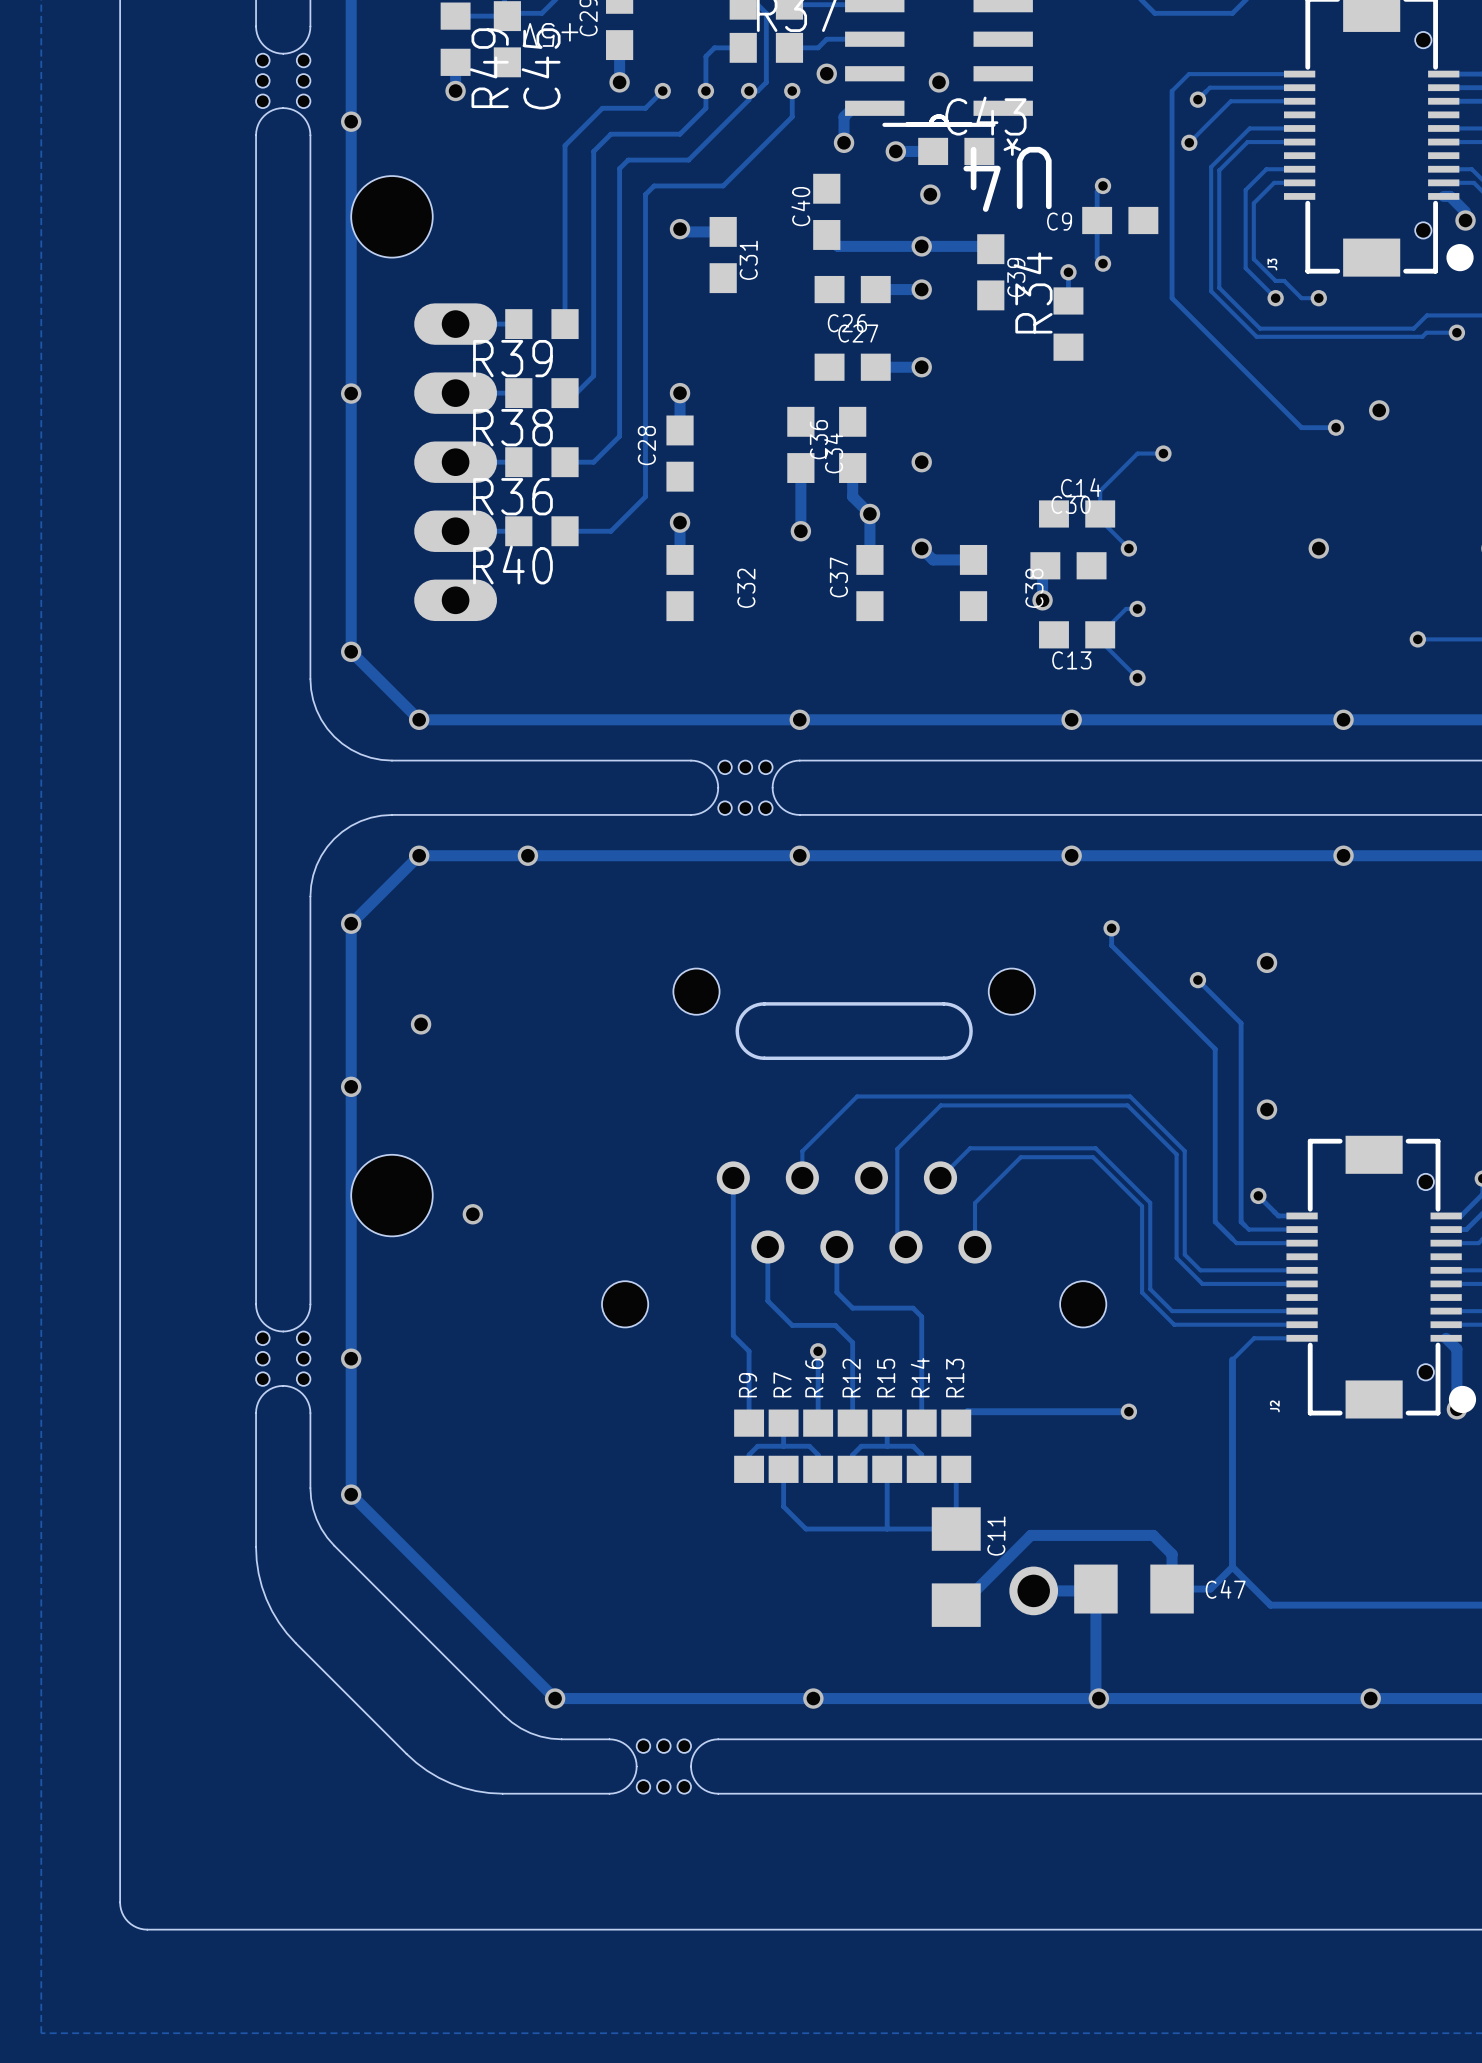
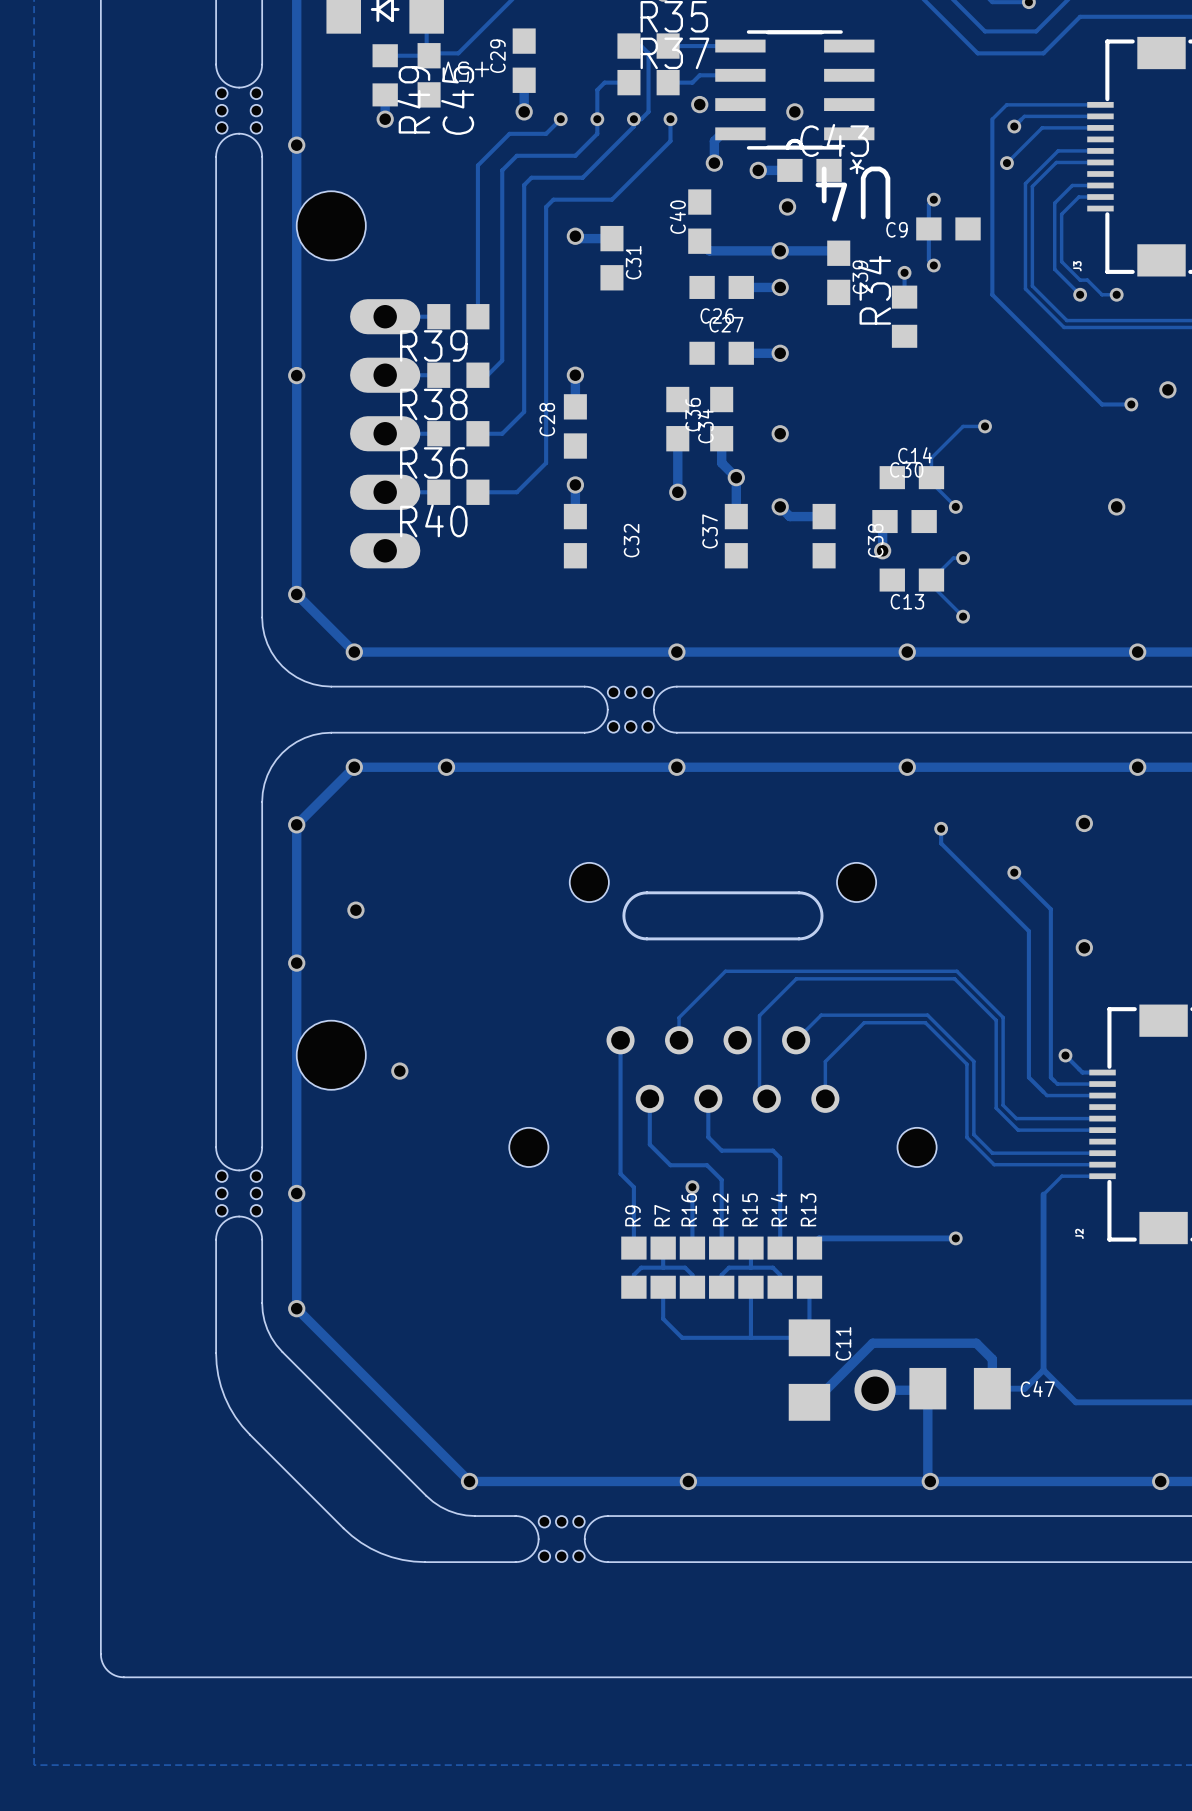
via position: (1267, 962) -> (1084, 823)
via position: (1267, 1109) -> (1084, 947)

